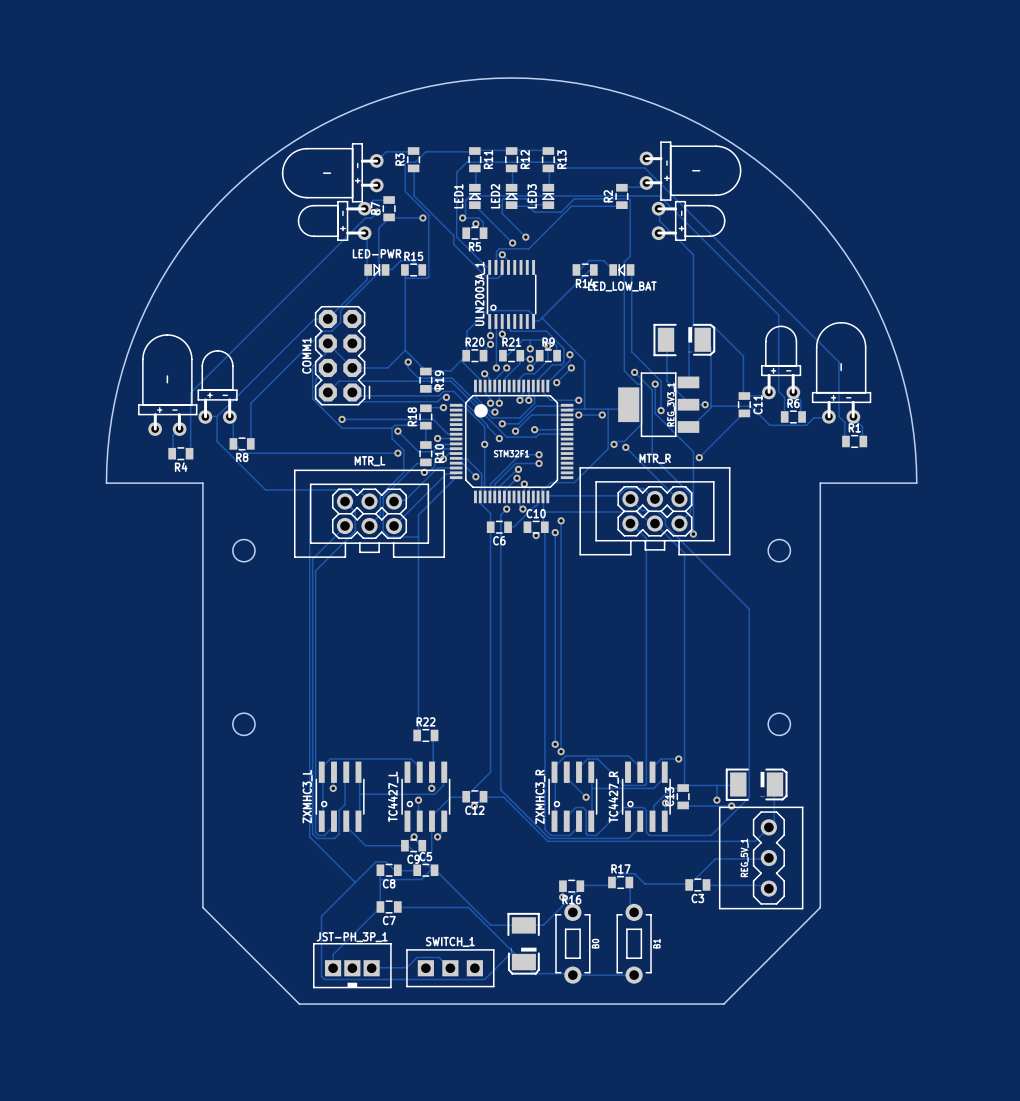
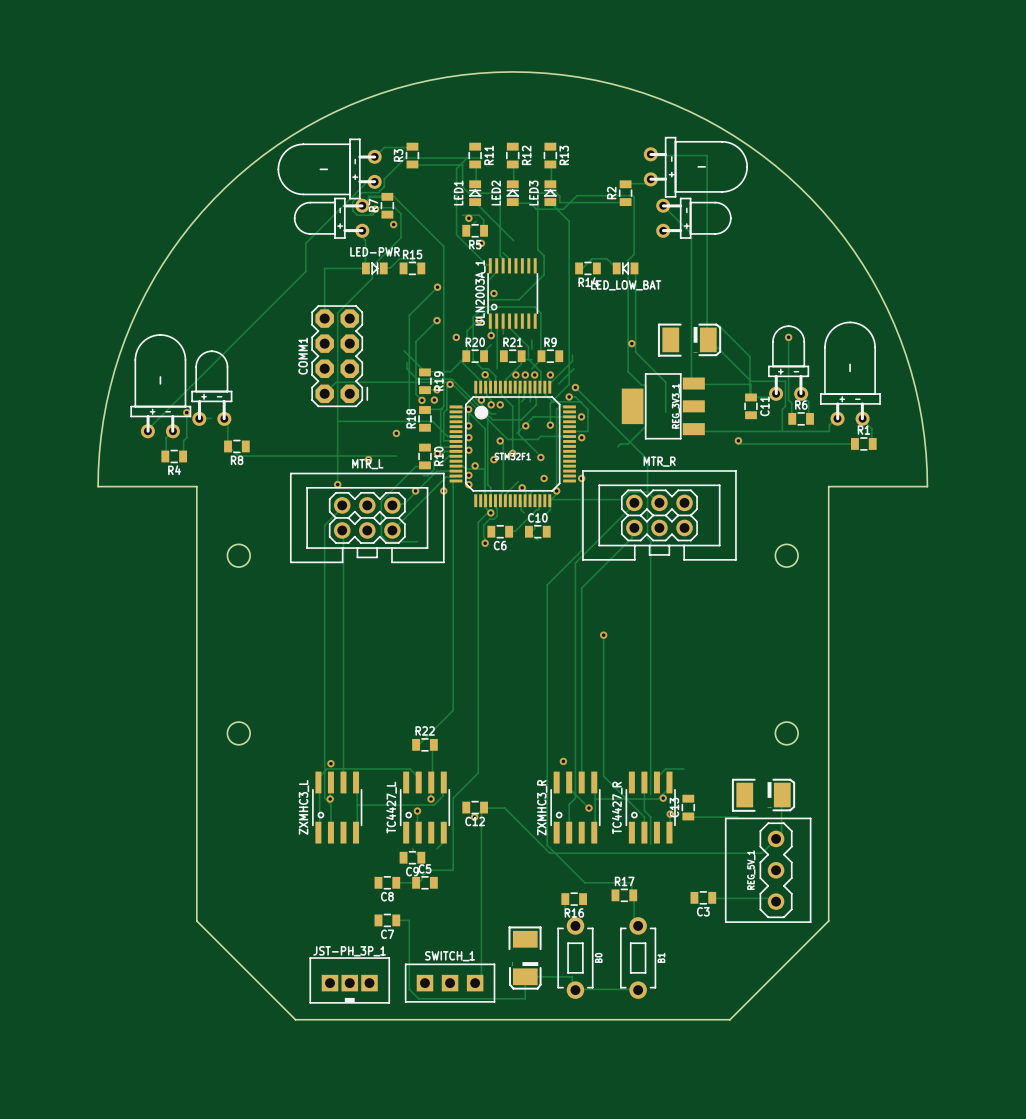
track: (548, 151) (425, 151) (415, 162) -> (467, 158) (414, 158)
track: none -> (650, 154) (707, 155) (707, 337) (750, 381) (785, 381) (785, 406) (782, 409) (782, 431)
track: (481, 162) (555, 162) (561, 168) (644, 168) (838, 362) (838, 416) (844, 422) (844, 441) -> (738, 440) (738, 443) (853, 443)
track: (405, 163) (405, 191) (428, 215) (428, 276) (405, 278) -> (403, 159) (384, 179) (384, 186) (378, 192) (361, 192) (352, 201) (352, 210) (357, 215) (363, 215)
track: (413, 168) (414, 195) (453, 235) (453, 244) (487, 278) (497, 278) (500, 275) (502, 267) -> (412, 164) (462, 164) (462, 186) (468, 193) (500, 193) (500, 255) (503, 259) (503, 265)
track: none -> (374, 181) (368, 180) (305, 243) (305, 271) (147, 431)
track: (548, 205) (531, 204) (525, 198) (502, 200) (502, 213) (525, 237) -> (550, 202) (569, 221) (569, 384) (550, 403) (550, 425)
track: (621, 205) (571, 206) (528, 248) (499, 248) (496, 251) (495, 267) -> (625, 202) (559, 202) (559, 196) (556, 193) (537, 193) (537, 249) (544, 255) (544, 274) (519, 299) (487, 299) (487, 280) (497, 271) (496, 265)
track: (658, 208) (659, 220) (693, 254) (693, 325) (689, 329) (688, 382) -> (663, 205) (691, 233) (691, 381) (694, 384) (750, 384) (750, 397)
track: (365, 218) (190, 392) (189, 453) -> (186, 412) (186, 437) (183, 440) (183, 456)
track: (422, 218) (389, 218) (378, 228) (378, 272) (340, 310) (340, 313) -> (369, 215) (372, 215) (379, 207) (394, 207) (400, 213) (400, 237) (372, 266) (372, 278) (337, 313)
via: (422, 218) -> none
via: (462, 218) -> none
track: (465, 218) (465, 200) (469, 195) (659, 195) (778, 315) (778, 391) (784, 397) (784, 416) -> (788, 337) (788, 400) (791, 403) (792, 418)
via: none -> (468, 218)
via: (475, 223) -> none
via: none -> (393, 224)
track: (364, 233) (367, 235) (367, 279) (327, 319) (314, 319) (217, 416) (217, 441) (265, 489) (358, 489) (369, 501) -> (362, 230) (362, 237) (365, 240) (365, 268)
via: (525, 237) -> none
via: (512, 243) -> none
via: none -> (481, 243)
via: (502, 254) -> none
track: none -> (365, 268) (324, 268) (324, 318)
track: (404, 269) (405, 350) (387, 367) (352, 367) (327, 343) -> none
track: (593, 269) (589, 270) (539, 320) (533, 321) (533, 315) (528, 310) (492, 310) -> none
track: none -> (437, 287) (409, 315) (409, 422) (406, 425)
via: none -> (437, 287)
via: none -> (493, 293)
track: (542, 317) (584, 360) (584, 409) -> none
track: none -> (437, 320) (415, 341) (415, 394) (421, 400)
via: none -> (437, 320)
via: none -> (479, 320)
track: (508, 321) (511, 331) (546, 331) (564, 348) (564, 362) (561, 365) (552, 365) (539, 378) (538, 386) -> (509, 321) (509, 327) (528, 346) (528, 359) (540, 371) (539, 387)
track: (340, 322) (331, 331) (322, 331) (250, 403) (250, 443) -> (337, 322) (337, 484)
via: (502, 334) -> none
via: none -> (456, 337)
via: none -> (788, 337)
track: (666, 339) (666, 381) (687, 401) (687, 404) (705, 404) -> none
track: (702, 339) (711, 347) (711, 407) (691, 426) (688, 427) -> none
via: none -> (631, 343)
via: (490, 344) -> none
track: (547, 345) (547, 360) (534, 373) (524, 373) (519, 378) (518, 386) -> (537, 453) (519, 434) (520, 387)
via: (547, 345) -> none
track: (331, 347) (312, 366) (312, 398) (342, 428) (392, 428) -> none
via: (530, 348) -> none
via: (569, 354) -> none
track: (502, 355) (508, 354) (522, 340) (550, 340) (556, 345) (557, 355) -> none
via: (530, 359) -> none
via: (408, 362) -> none
track: (327, 367) (315, 379) (315, 397) (322, 404) (356, 404) (359, 401) (437, 401) (442, 397) (446, 397) -> none
via: (496, 367) -> none
track: (506, 367) (494, 379) -> (541, 356) (540, 313) (534, 307) (483, 307) (473, 317) (473, 359) (482, 368) (488, 368) (495, 376) (495, 380)
via: (506, 367) -> none
via: (530, 367) -> none
via: (571, 367) -> none
track: (634, 372) (652, 390) (652, 456) (690, 494) (690, 512) (679, 523) -> none
via: (634, 372) -> none
via: none -> (515, 374)
via: none -> (525, 374)
via: none -> (534, 374)
via: none -> (550, 374)
via: (556, 382) -> none
via: none -> (450, 384)
track: (655, 384) (655, 413) (693, 451) (693, 534) -> none
via: (655, 384) -> none
via: none -> (575, 387)
track: (352, 392) (355, 395) (439, 395) (443, 391) (453, 391) (499, 438) -> none
track: (499, 392) (499, 403) -> (500, 393) (512, 406) (512, 453)
via: none -> (569, 396)
via: (446, 397) -> none
via: none -> (421, 400)
via: none -> (434, 400)
via: none -> (481, 400)
via: (519, 400) -> none
via: (528, 400) -> none
via: (578, 400) -> none
track: (628, 404) (622, 409) (567, 410) -> none
via: (705, 404) -> none
track: (567, 405) (536, 406) (518, 423) (502, 423) -> (569, 406) (559, 406) (556, 409) (556, 494) (549, 500) (550, 509) (534, 525) (534, 528) (528, 531)
track: (711, 406) (750, 406) (769, 425) (806, 425) (813, 417) (828, 416) -> (693, 429) (694, 431) (829, 431) (829, 425) (837, 418)
via: (443, 407) -> none
track: none -> (468, 409) (468, 425)
via: none -> (468, 409)
track: (608, 409) (608, 448) (574, 482) (550, 482) (544, 488) (542, 488) (544, 528) (544, 829) (550, 835) (569, 835) (578, 826) (579, 821) -> none
via: none -> (186, 412)
via: (661, 410) -> none
via: (494, 412) -> none
track: (744, 413) (699, 457) -> none
track: (578, 415) (602, 415) -> none
via: (602, 415) -> none
via: (342, 419) -> none
via: none -> (468, 425)
via: (502, 423) -> none
via: none -> (525, 425)
via: none -> (550, 425)
track: (392, 428) (394, 425) (425, 425) (425, 445) -> none
track: (392, 428) (392, 438) (403, 450) (403, 472) (380, 495) (380, 514) (369, 525) -> none
via: (534, 429) -> none
track: (567, 429) (534, 429) -> (569, 431) (587, 431) (587, 409) (575, 396) (569, 396)
track: (397, 431) (418, 451) (433, 451) (440, 444) (456, 443) -> (368, 199) (368, 196) (393, 196) (443, 246) (443, 406) (440, 409) (440, 447) (455, 446)
via: (515, 431) -> none
via: none -> (468, 437)
via: none -> (581, 437)
track: (437, 438) (456, 439) -> (450, 384) (446, 387) (446, 409) (443, 412) (443, 440) (455, 441)
via: (437, 438) -> none
via: none -> (738, 440)
via: (484, 444) -> none
via: (614, 444) -> none
via: none -> (468, 450)
track: (625, 447) (679, 499) -> none
via: (625, 447) -> none
via: none -> (437, 453)
via: none -> (512, 453)
via: (397, 453) -> none
track: (539, 454) (519, 454) (490, 484) (489, 496) -> (487, 409) (487, 484) (490, 487) (490, 500)
via: none -> (368, 459)
via: none -> (493, 459)
via: (699, 457) -> none
track: (456, 458) (467, 459) (481, 473) (480, 503) (490, 513) (490, 772) (465, 797) (450, 797) (433, 814) (431, 851) (422, 860) -> none
via: (443, 459) -> none
via: none -> (475, 465)
track: (456, 463) (462, 463) (475, 476) -> (455, 466) (462, 465) (465, 469) (484, 469) (484, 506) (487, 509) (487, 512) (478, 522) (478, 773) (453, 798) (453, 870) (428, 870) (418, 882) (396, 882)
track: (539, 463) (515, 463) (494, 484) (494, 496) -> (485, 543) (483, 525) (489, 519) (494, 519) (497, 516) (495, 500)
via: (539, 463) -> none
track: (518, 469) (499, 487) (499, 490) -> (500, 440) (503, 443) (503, 490) (500, 494)
via: (518, 469) -> none
via: (424, 472) -> none
via: none -> (468, 475)
via: none -> (544, 478)
track: none -> (581, 478) (581, 550) (547, 585) (547, 845) (584, 882) (631, 882) (633, 895)
via: none -> (581, 478)
via: (475, 476) -> none
track: (456, 477) (418, 514) (418, 735) -> (455, 480) (453, 481) (453, 710) (417, 744)
via: (517, 478) -> none
via: none -> (337, 484)
via: none -> (468, 484)
via: none -> (522, 487)
via: (524, 484) -> none
via: none -> (415, 490)
via: none -> (443, 490)
via: none -> (556, 490)
track: (309, 489) (309, 836) (355, 882) -> none
track: (630, 499) (641, 510) (656, 510) (665, 519) (665, 525) (749, 609) (749, 797) (711, 835) (649, 835) (646, 832) -> (634, 502) (575, 563) (575, 798) (569, 804) (569, 832)
track: (345, 501) (355, 512) (355, 531) (315, 570) (315, 832) (318, 835) (324, 835) (333, 826) (333, 821) -> (342, 505) (324, 525) (324, 798) (330, 804) (330, 832)
via: none -> (490, 512)
track: (506, 509) (500, 514) (500, 789) (549, 838) (628, 838) (639, 828) (640, 821) -> (603, 635) (603, 776) (644, 816) (644, 832)
via: (506, 509) -> none
via: (522, 509) -> none
track: (543, 512) (639, 512) (649, 522) (653, 522) (684, 553) (684, 785) -> none
track: (561, 520) (561, 751) -> none
via: (561, 520) -> none
track: (630, 523) (646, 538) -> (575, 387) (647, 459) (647, 537) (650, 543)
track: (345, 525) (312, 559) (312, 833) (317, 838) (334, 838) (339, 833) (339, 810) (345, 804) (346, 772) -> (342, 530) (343, 782)
track: (555, 532) (555, 744) -> none
via: (555, 532) -> none
via: (693, 534) -> none
via: (536, 535) -> none
via: none -> (485, 543)
via: none -> (603, 635)
via: (555, 744) -> none
via: none -> (330, 763)
via: (678, 759) -> none
track: (579, 772) (580, 766) (587, 759) (597, 759) (624, 785) (646, 783) -> (581, 782) (581, 588) (631, 537) (631, 528) (634, 527)
track: (640, 772) (639, 766) (628, 756) (565, 756) (555, 766) (554, 821) -> none
track: (738, 784) (684, 785) -> none
track: (684, 785) (683, 788) (671, 788) (653, 806) (652, 821) -> none
track: (716, 785) (716, 800) -> none
via: none -> (663, 798)
track: none -> (484, 807) (481, 807) (481, 976) (475, 983)
via: (716, 800) -> none
via: (731, 806) -> none
track: (646, 810) (643, 807) (624, 807) (596, 835) (586, 833) (586, 810) (583, 807) (575, 807) (566, 816) (566, 821) -> (650, 821) (650, 816) (644, 810) (644, 782)
track: (346, 821) (346, 826) (365, 845) (404, 845) -> none
via: (414, 836) -> none
via: (437, 836) -> none
track: (406, 845) (434, 870) -> none
track: (768, 857) (715, 858) (689, 884) (644, 883) (634, 873) (621, 873) (608, 885) (581, 885) (543, 925) (490, 925) (434, 870) -> none
track: (380, 870) (380, 907) (333, 954) (333, 968) -> none
track: (417, 870) (397, 870) (386, 861) (375, 861) (321, 916) (321, 976) (324, 979) (484, 979) (512, 951) -> none
track: (434, 870) (431, 869) (421, 879) (380, 879) -> none
via: (562, 897) -> none
track: (397, 906) (468, 907) (534, 973) (572, 974) -> (396, 920) (409, 920) (409, 989) (418, 998) (525, 998) (525, 976)
track: (371, 968) (406, 967) (417, 957) (439, 957) (450, 968) -> none
track: (572, 975) (634, 975) -> (525, 976) (572, 976) (572, 986) (575, 989) (638, 990)

